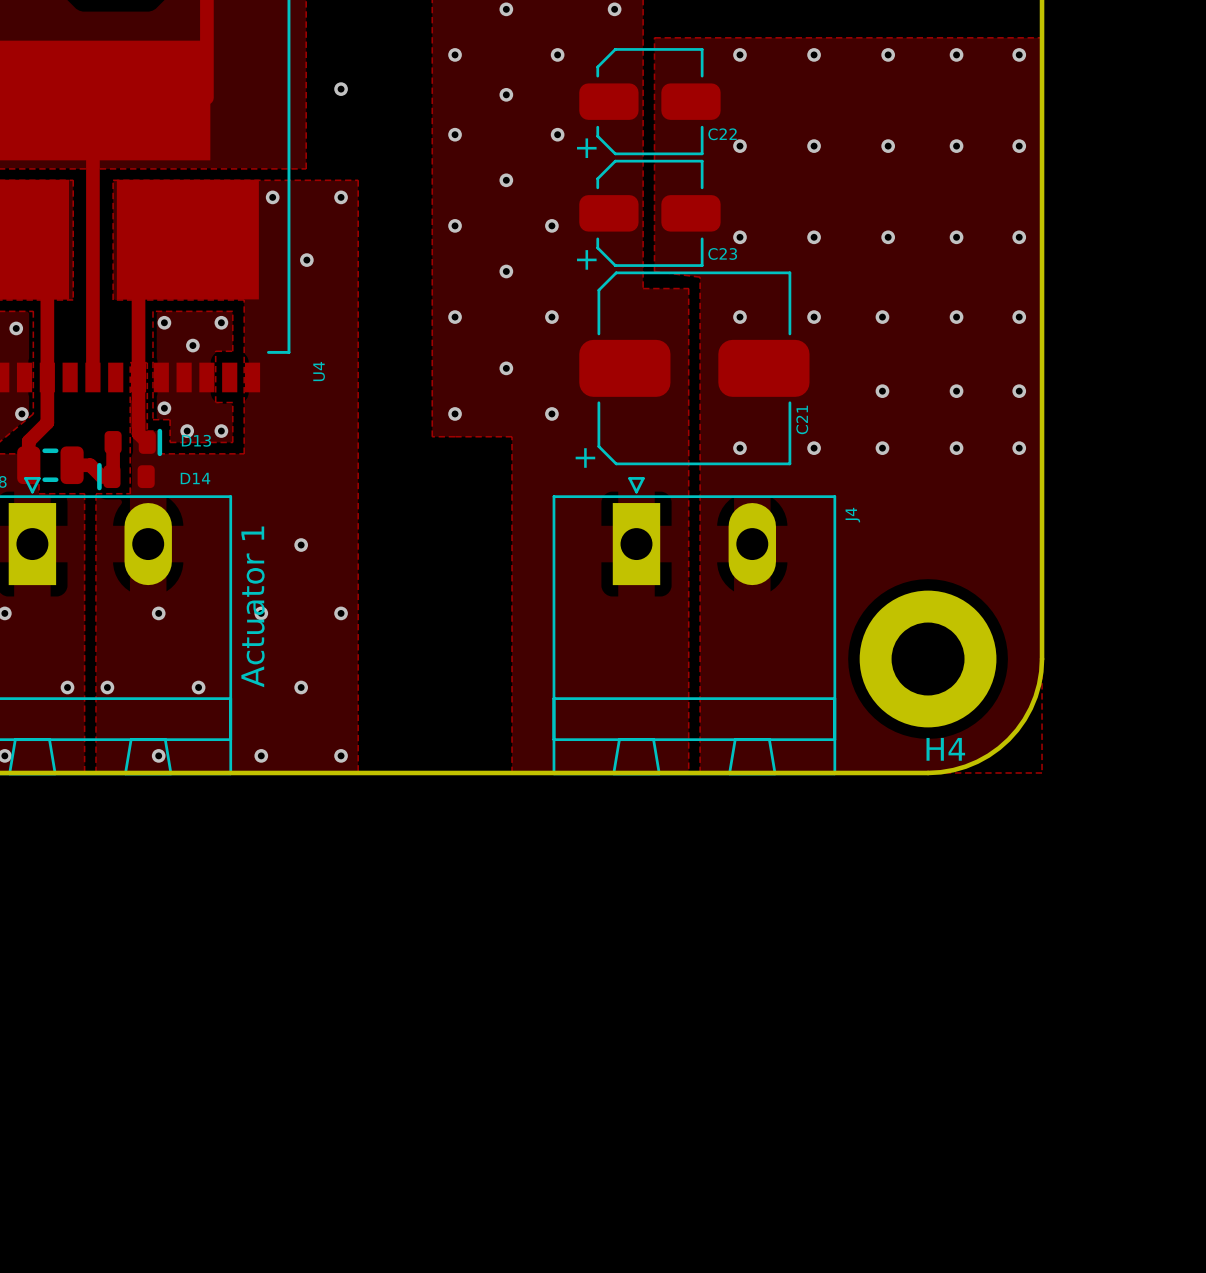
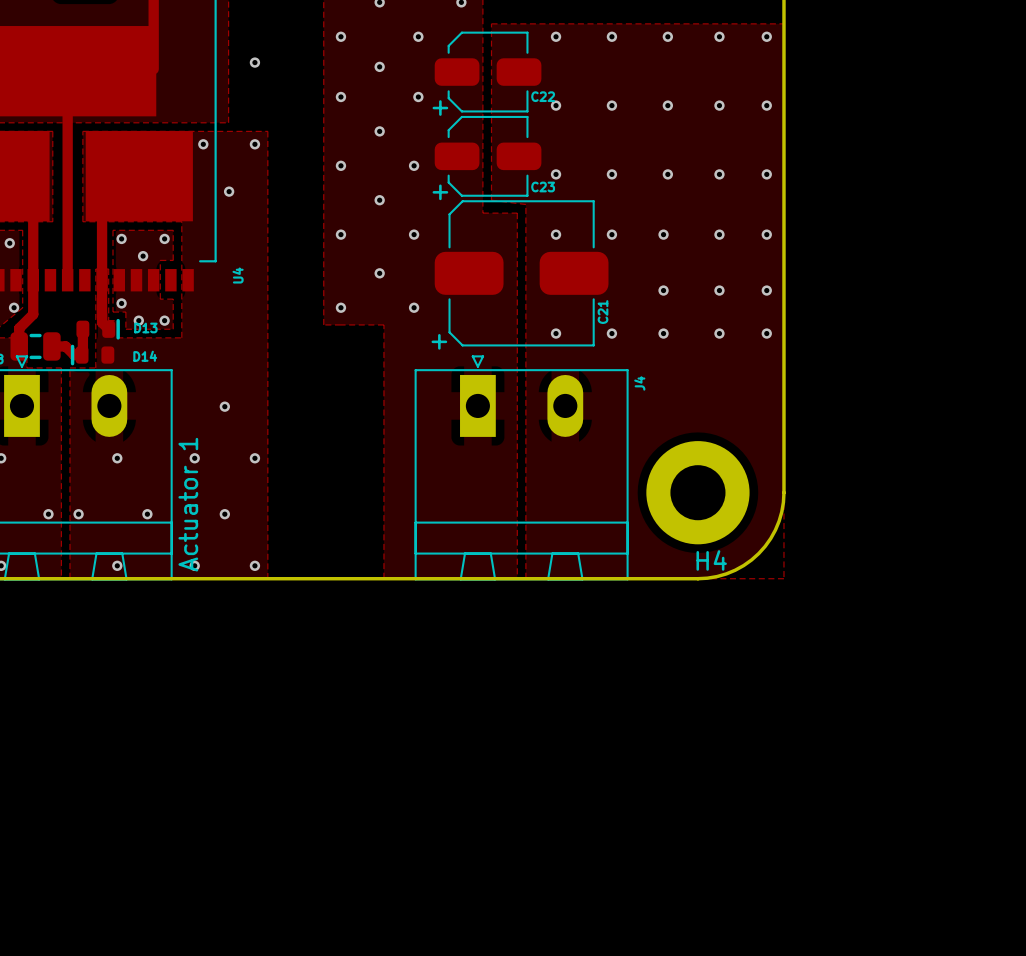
text position: Actuator 1 (253, 606) -> Actuator 1 (188, 504)

